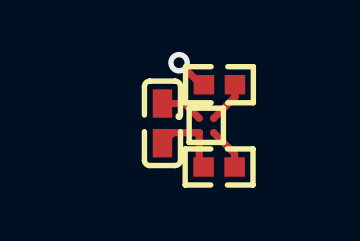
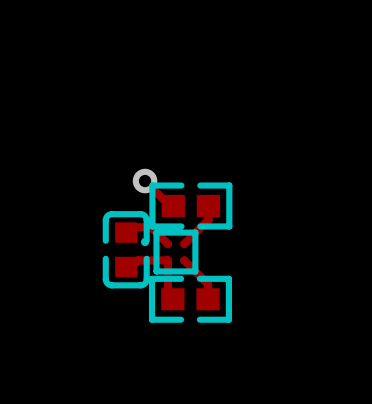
part footprint: [141, 78, 184, 169] -> [102, 211, 150, 289]

